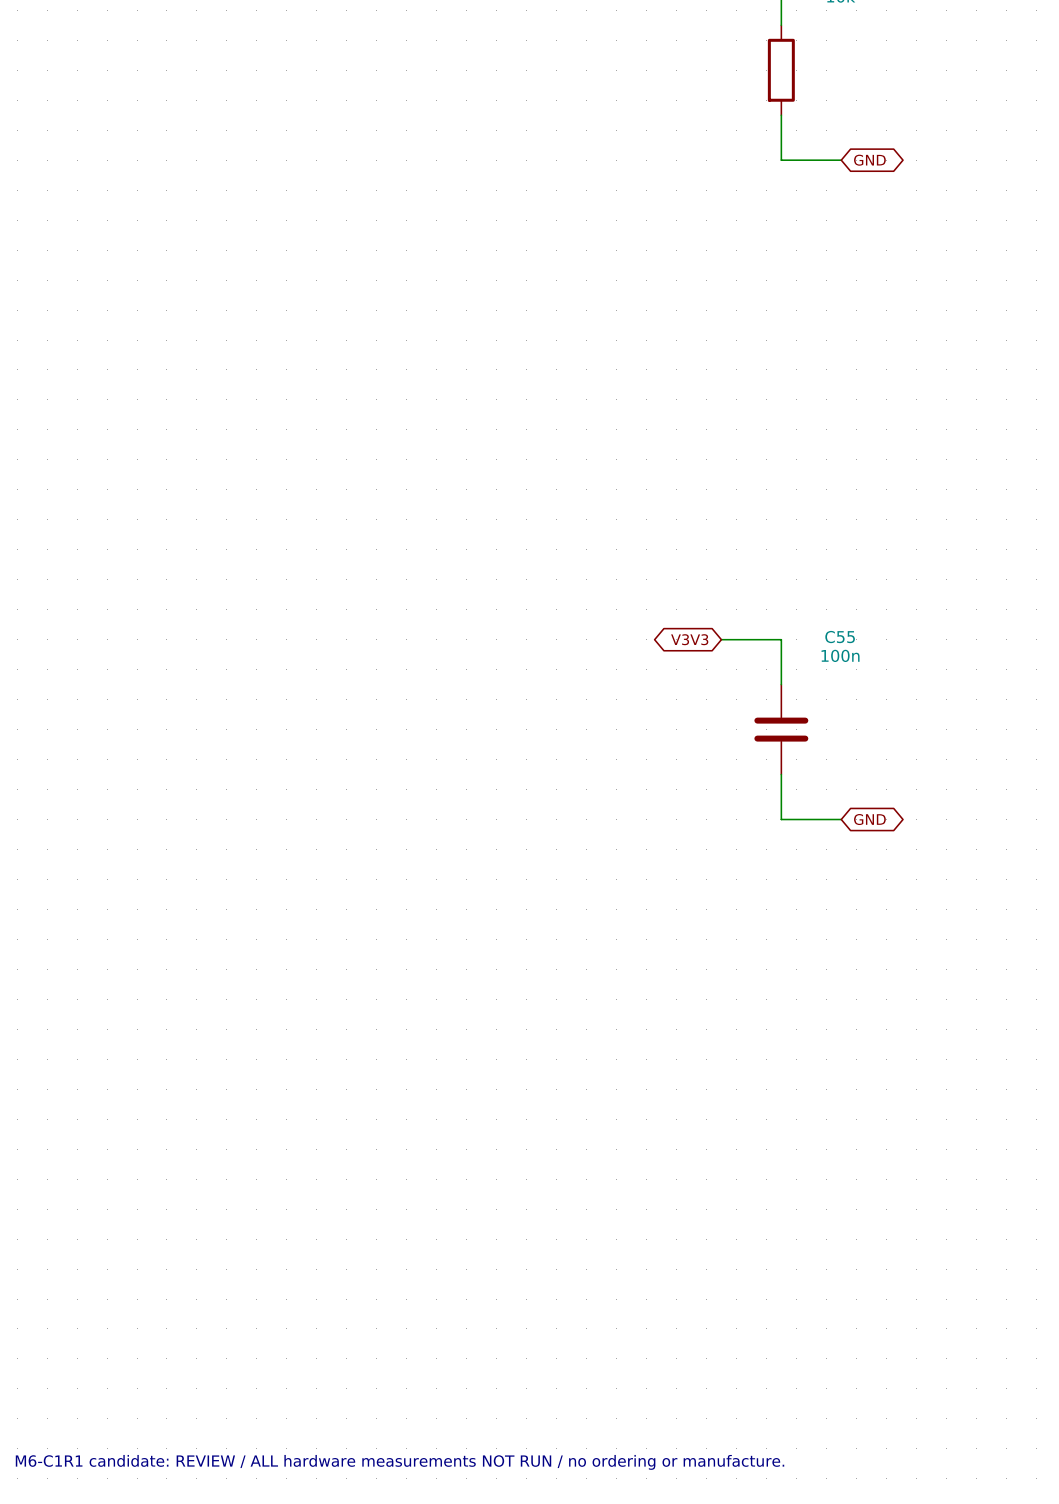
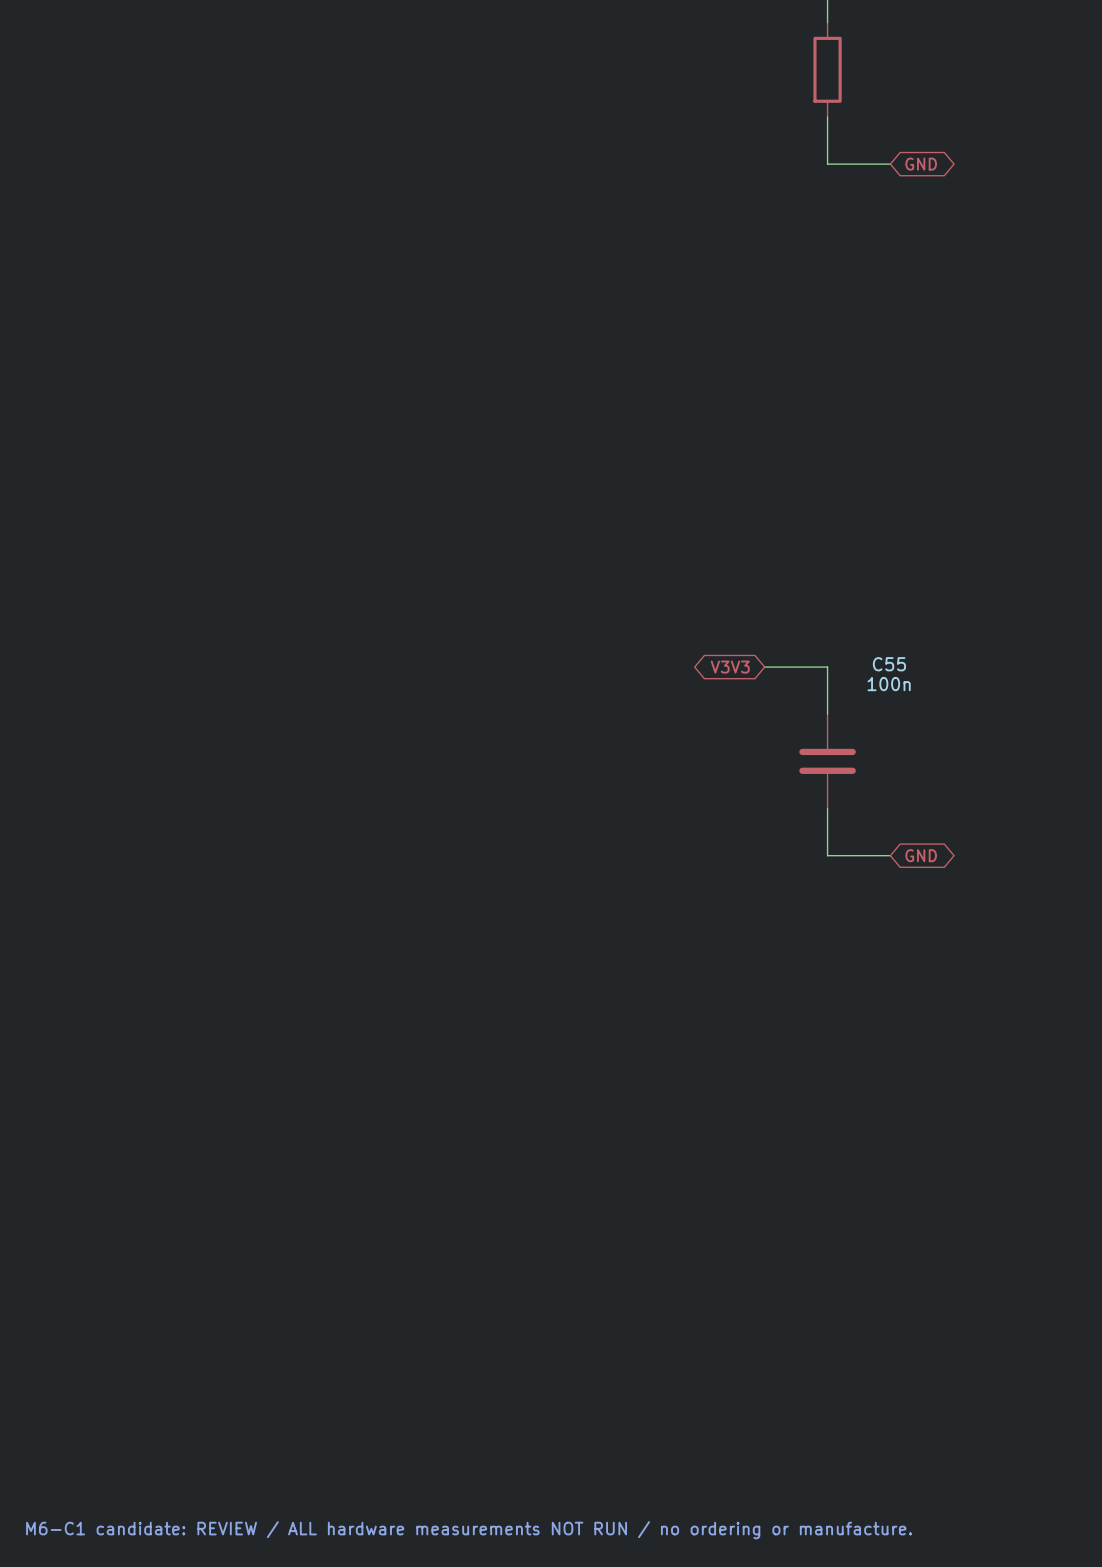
text: M6-C1R1 candidate: REVIEW / ALL hardware measurements NOT RUN / no ordering or manufacture. (400, 1462) -> M6-C1 candidate: REVIEW / ALL hardware measurements NOT RUN / no ordering or manufacture. (469, 1530)

